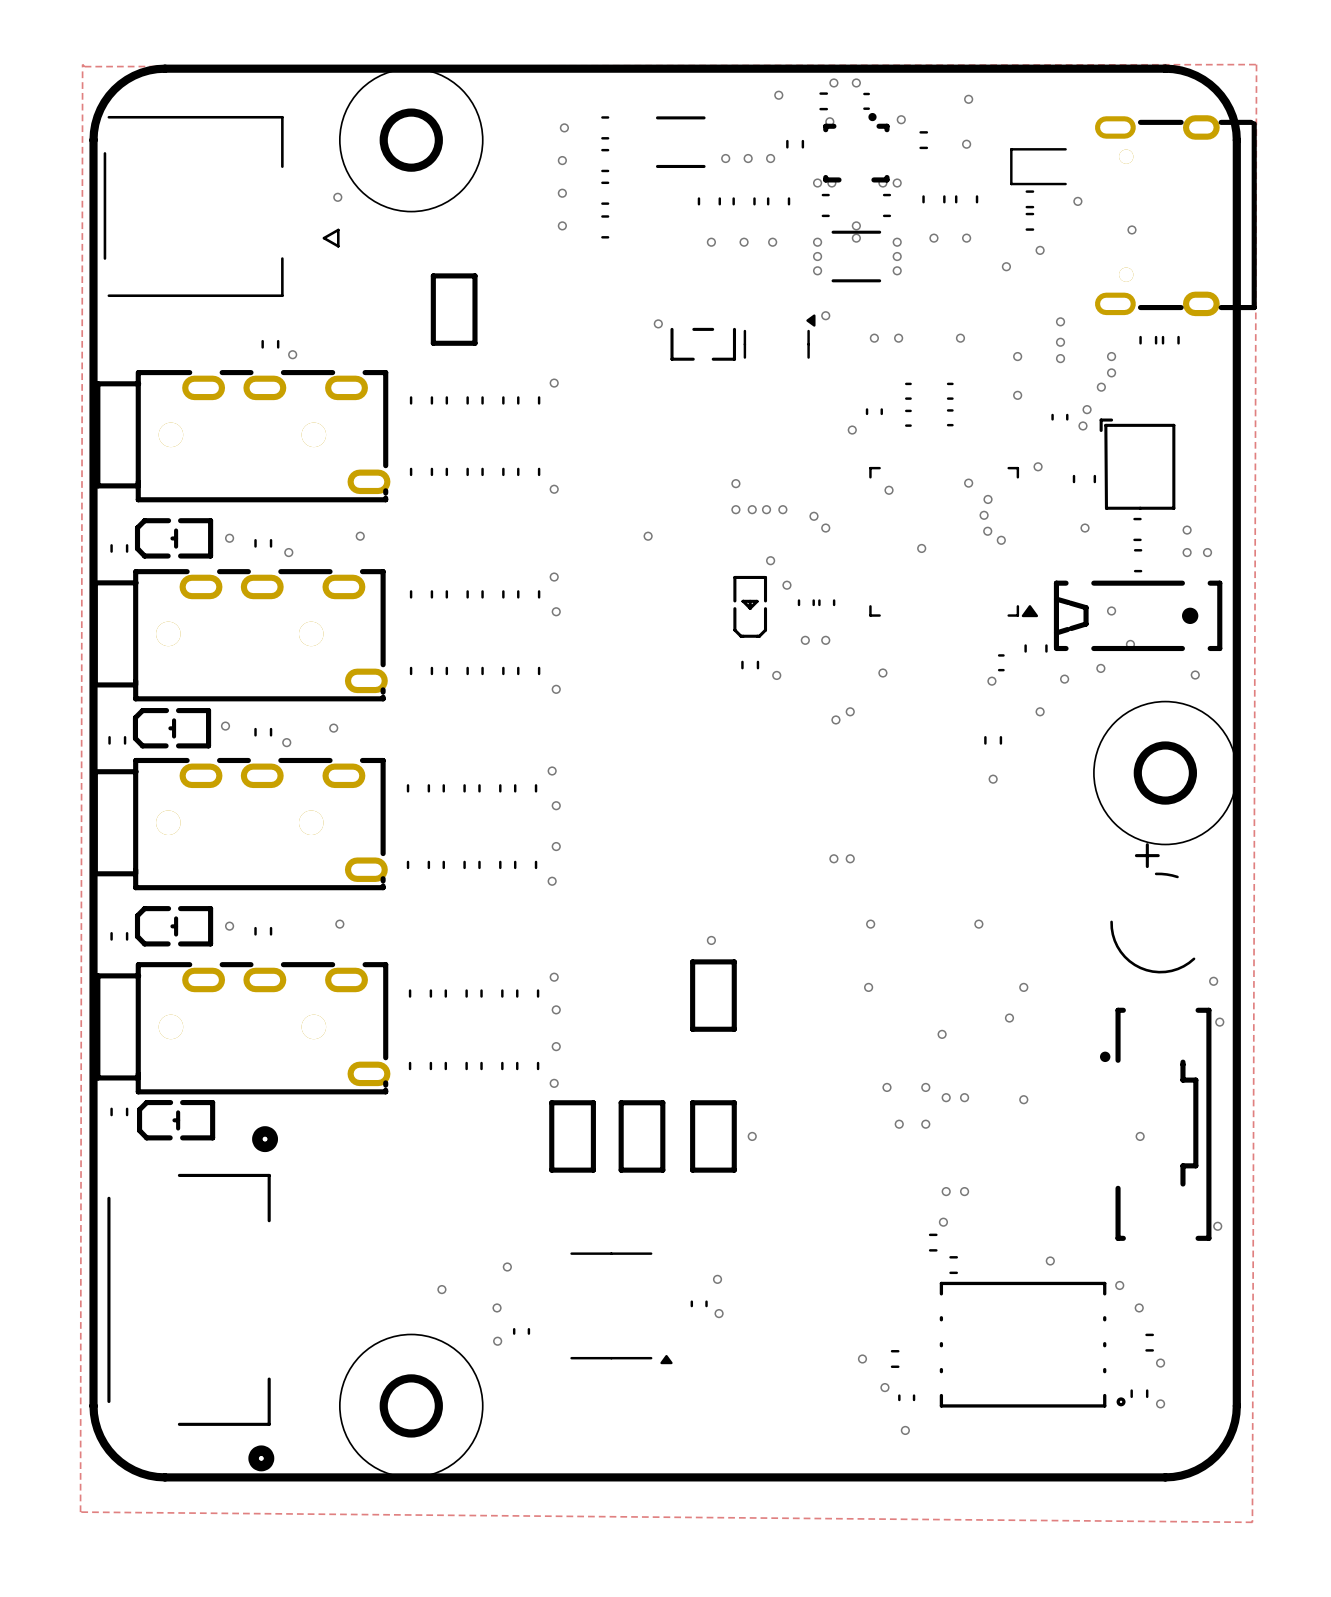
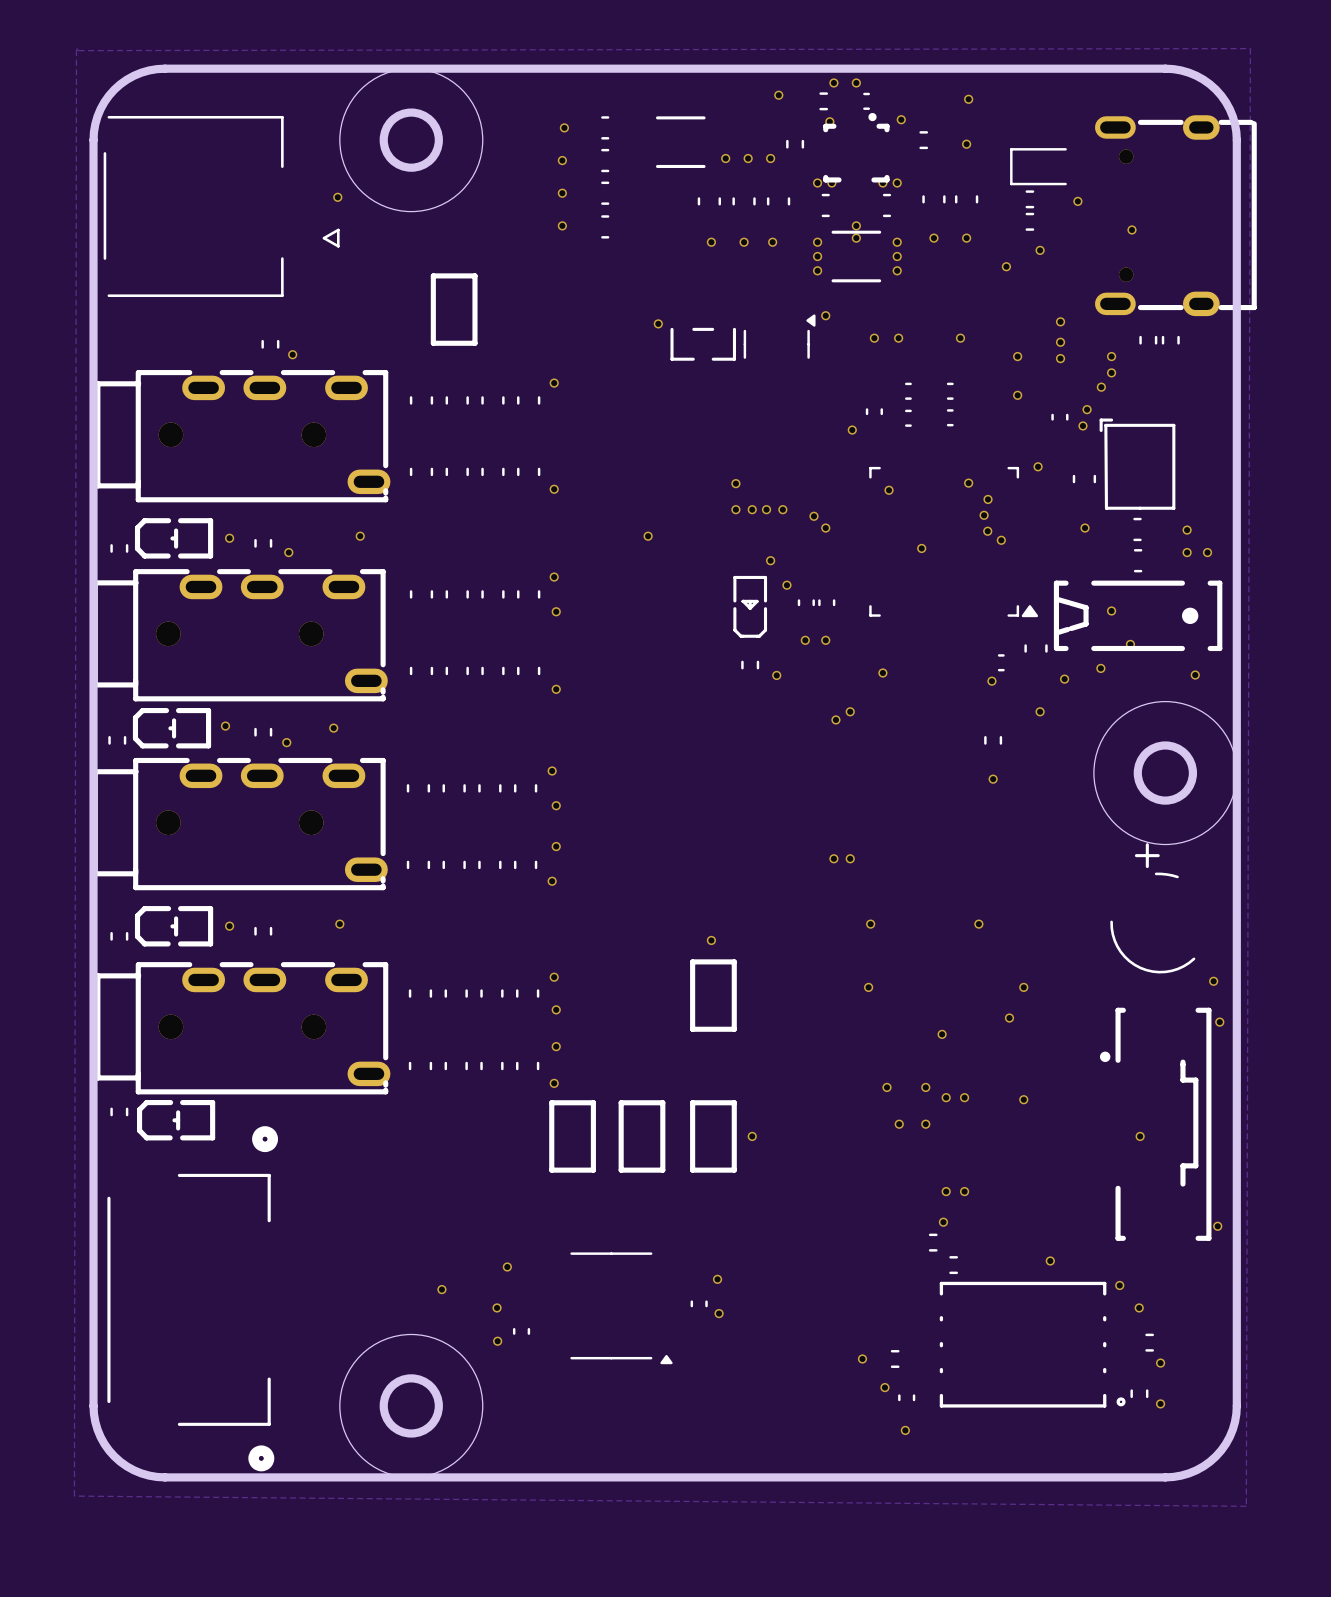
zone outline: (82, 64) (80, 1512) (1252, 1522) (1256, 64) (84, 66) (82, 64) -> (76, 48) (74, 1496) (1246, 1506) (1250, 48) (78, 50) (76, 48)

